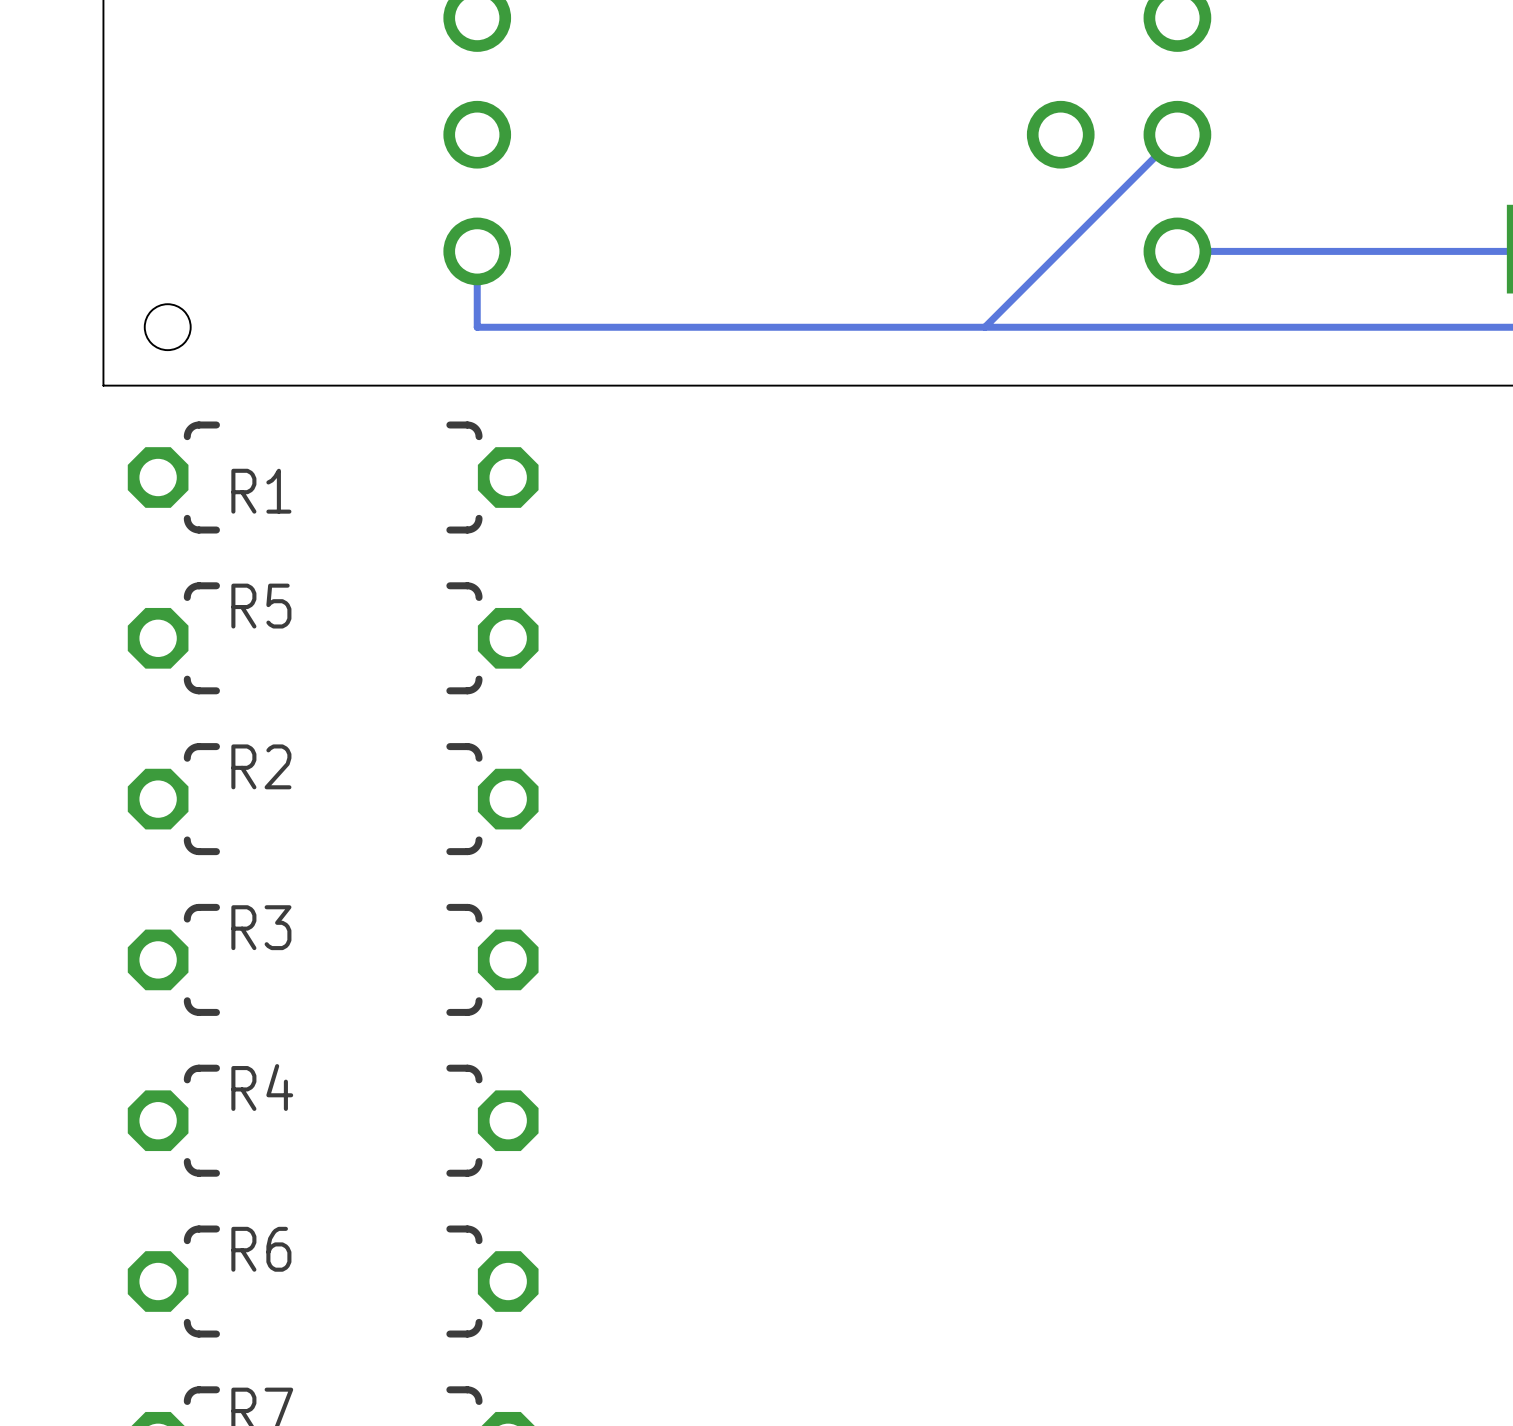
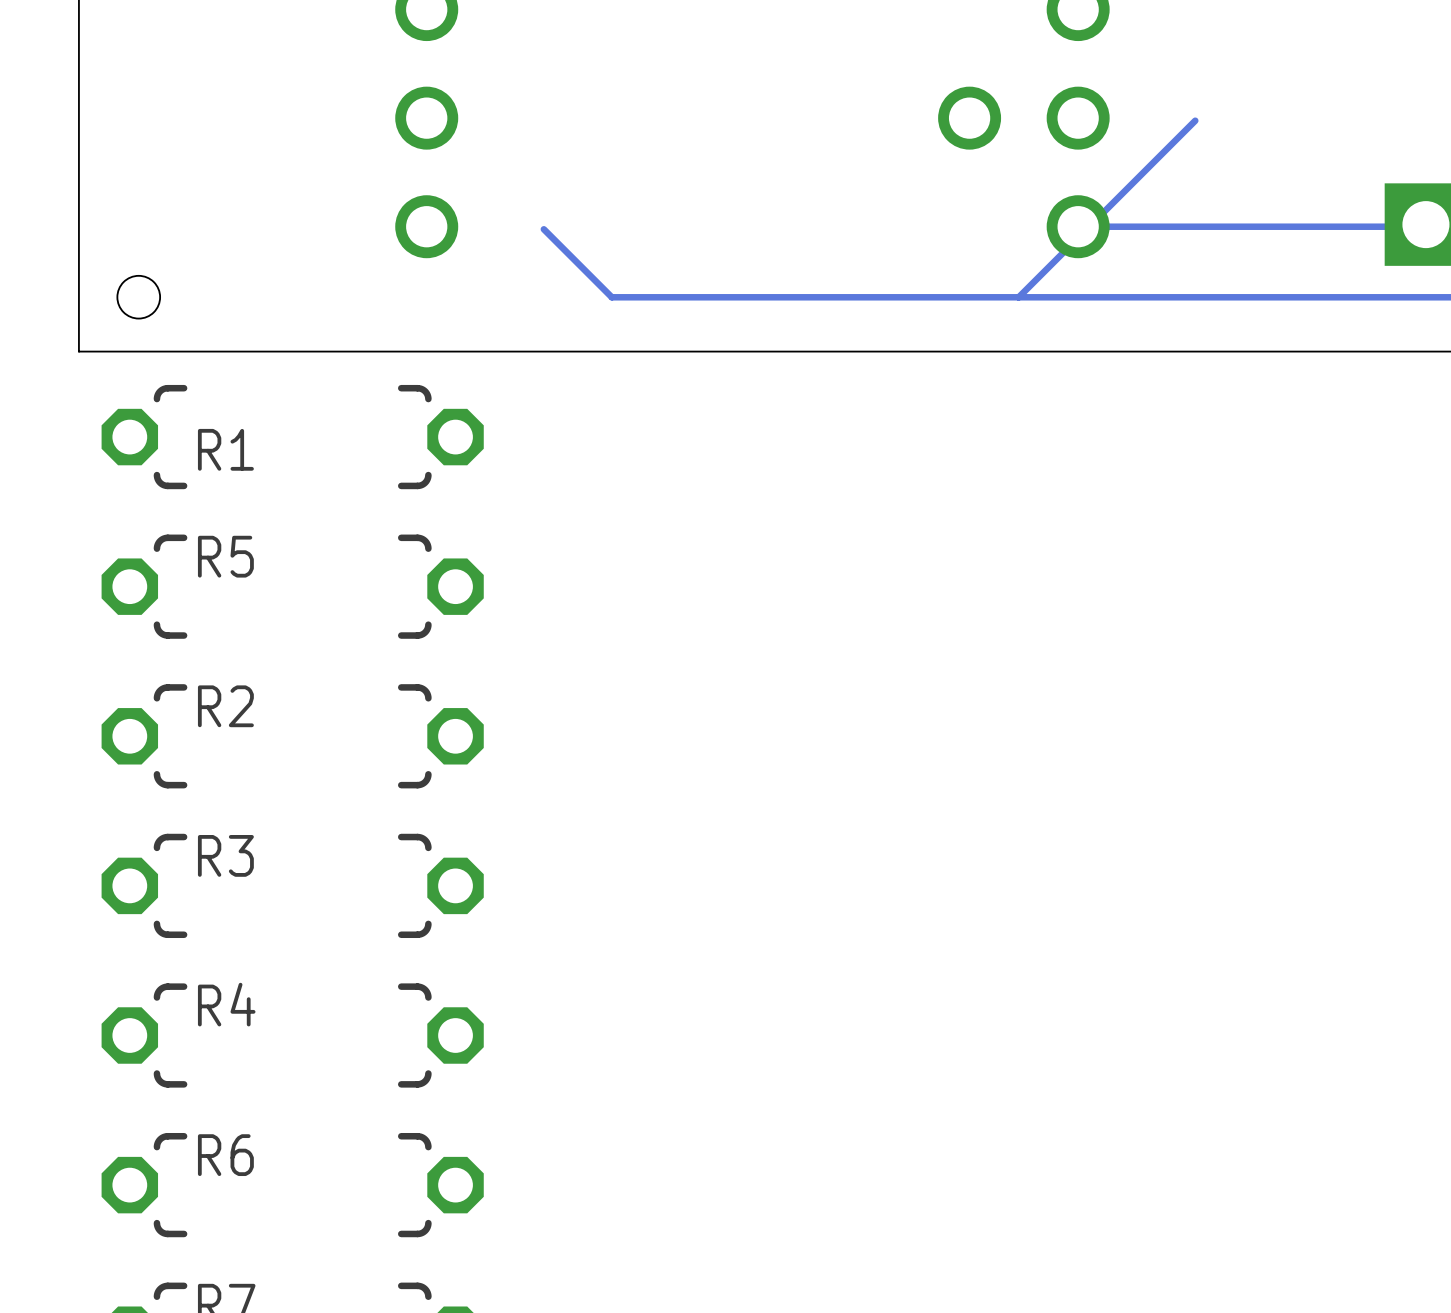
bottom track: (1177, 134) (984, 327) -> none
bottom track: none -> (1195, 120) (1018, 297)
bottom track: (477, 251) (477, 327) (676, 327) -> (543, 229) (611, 297)

